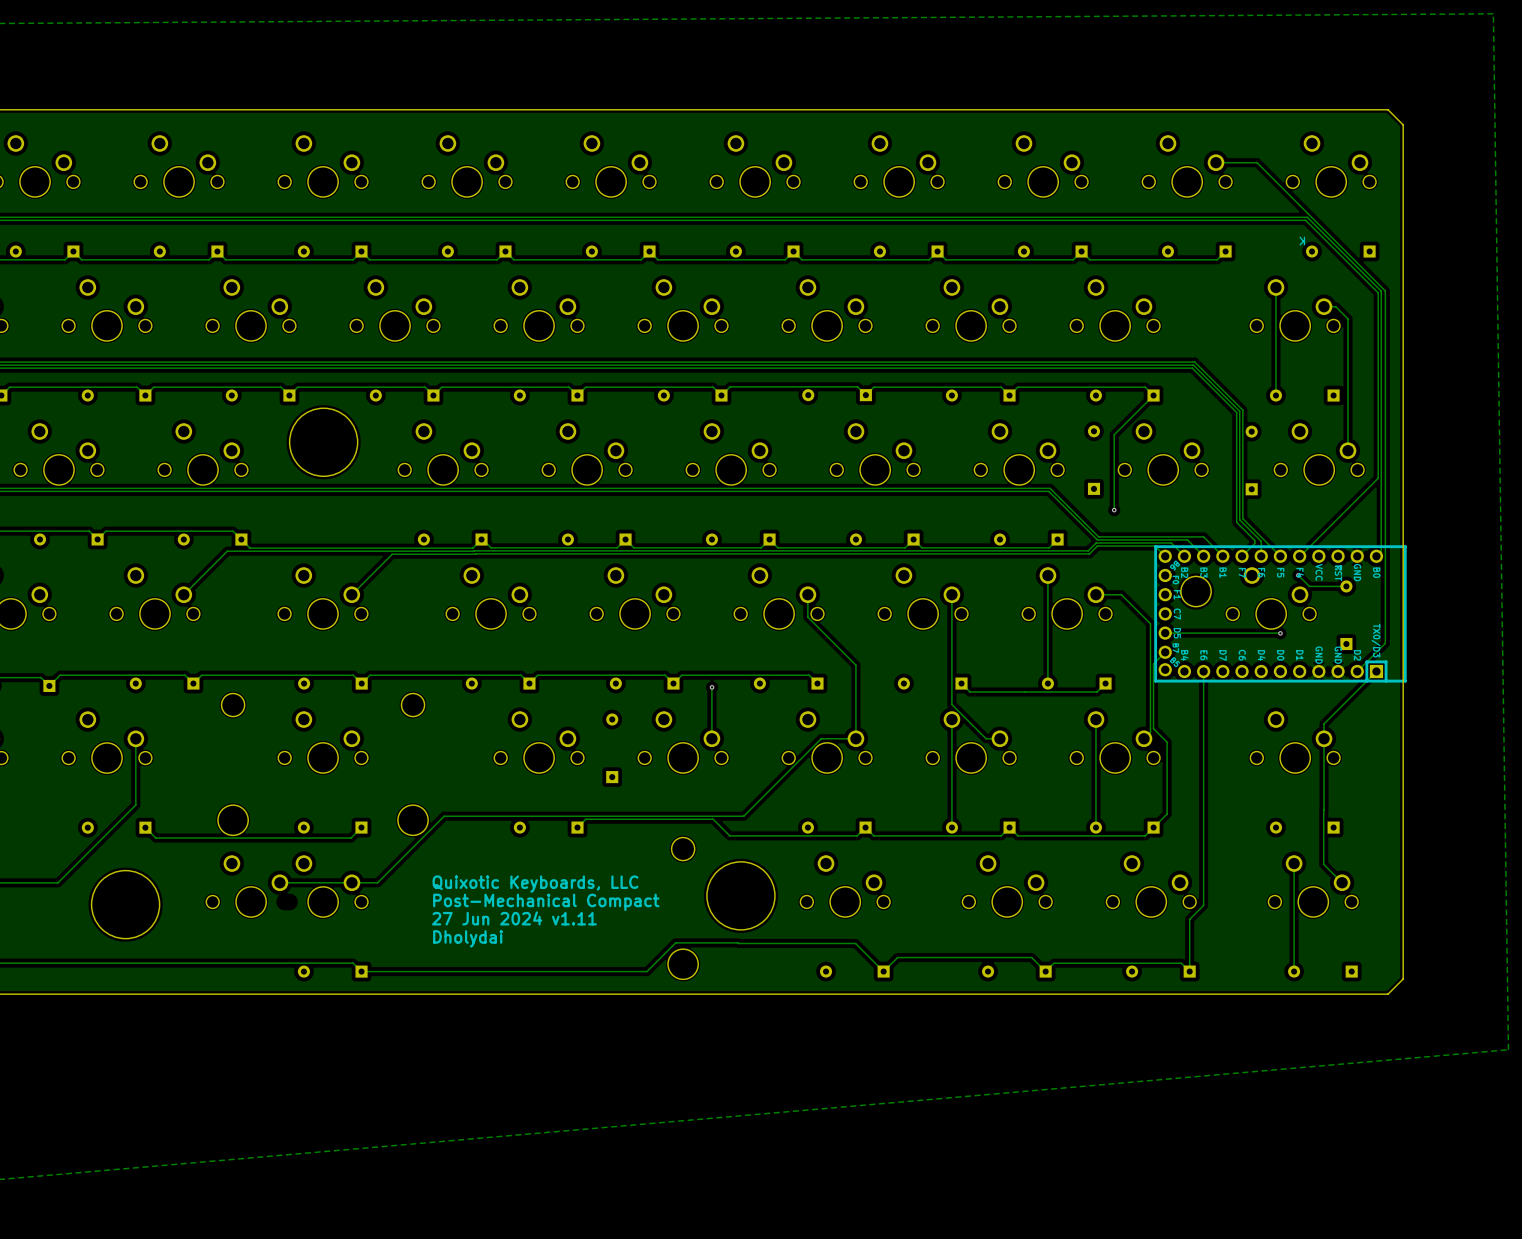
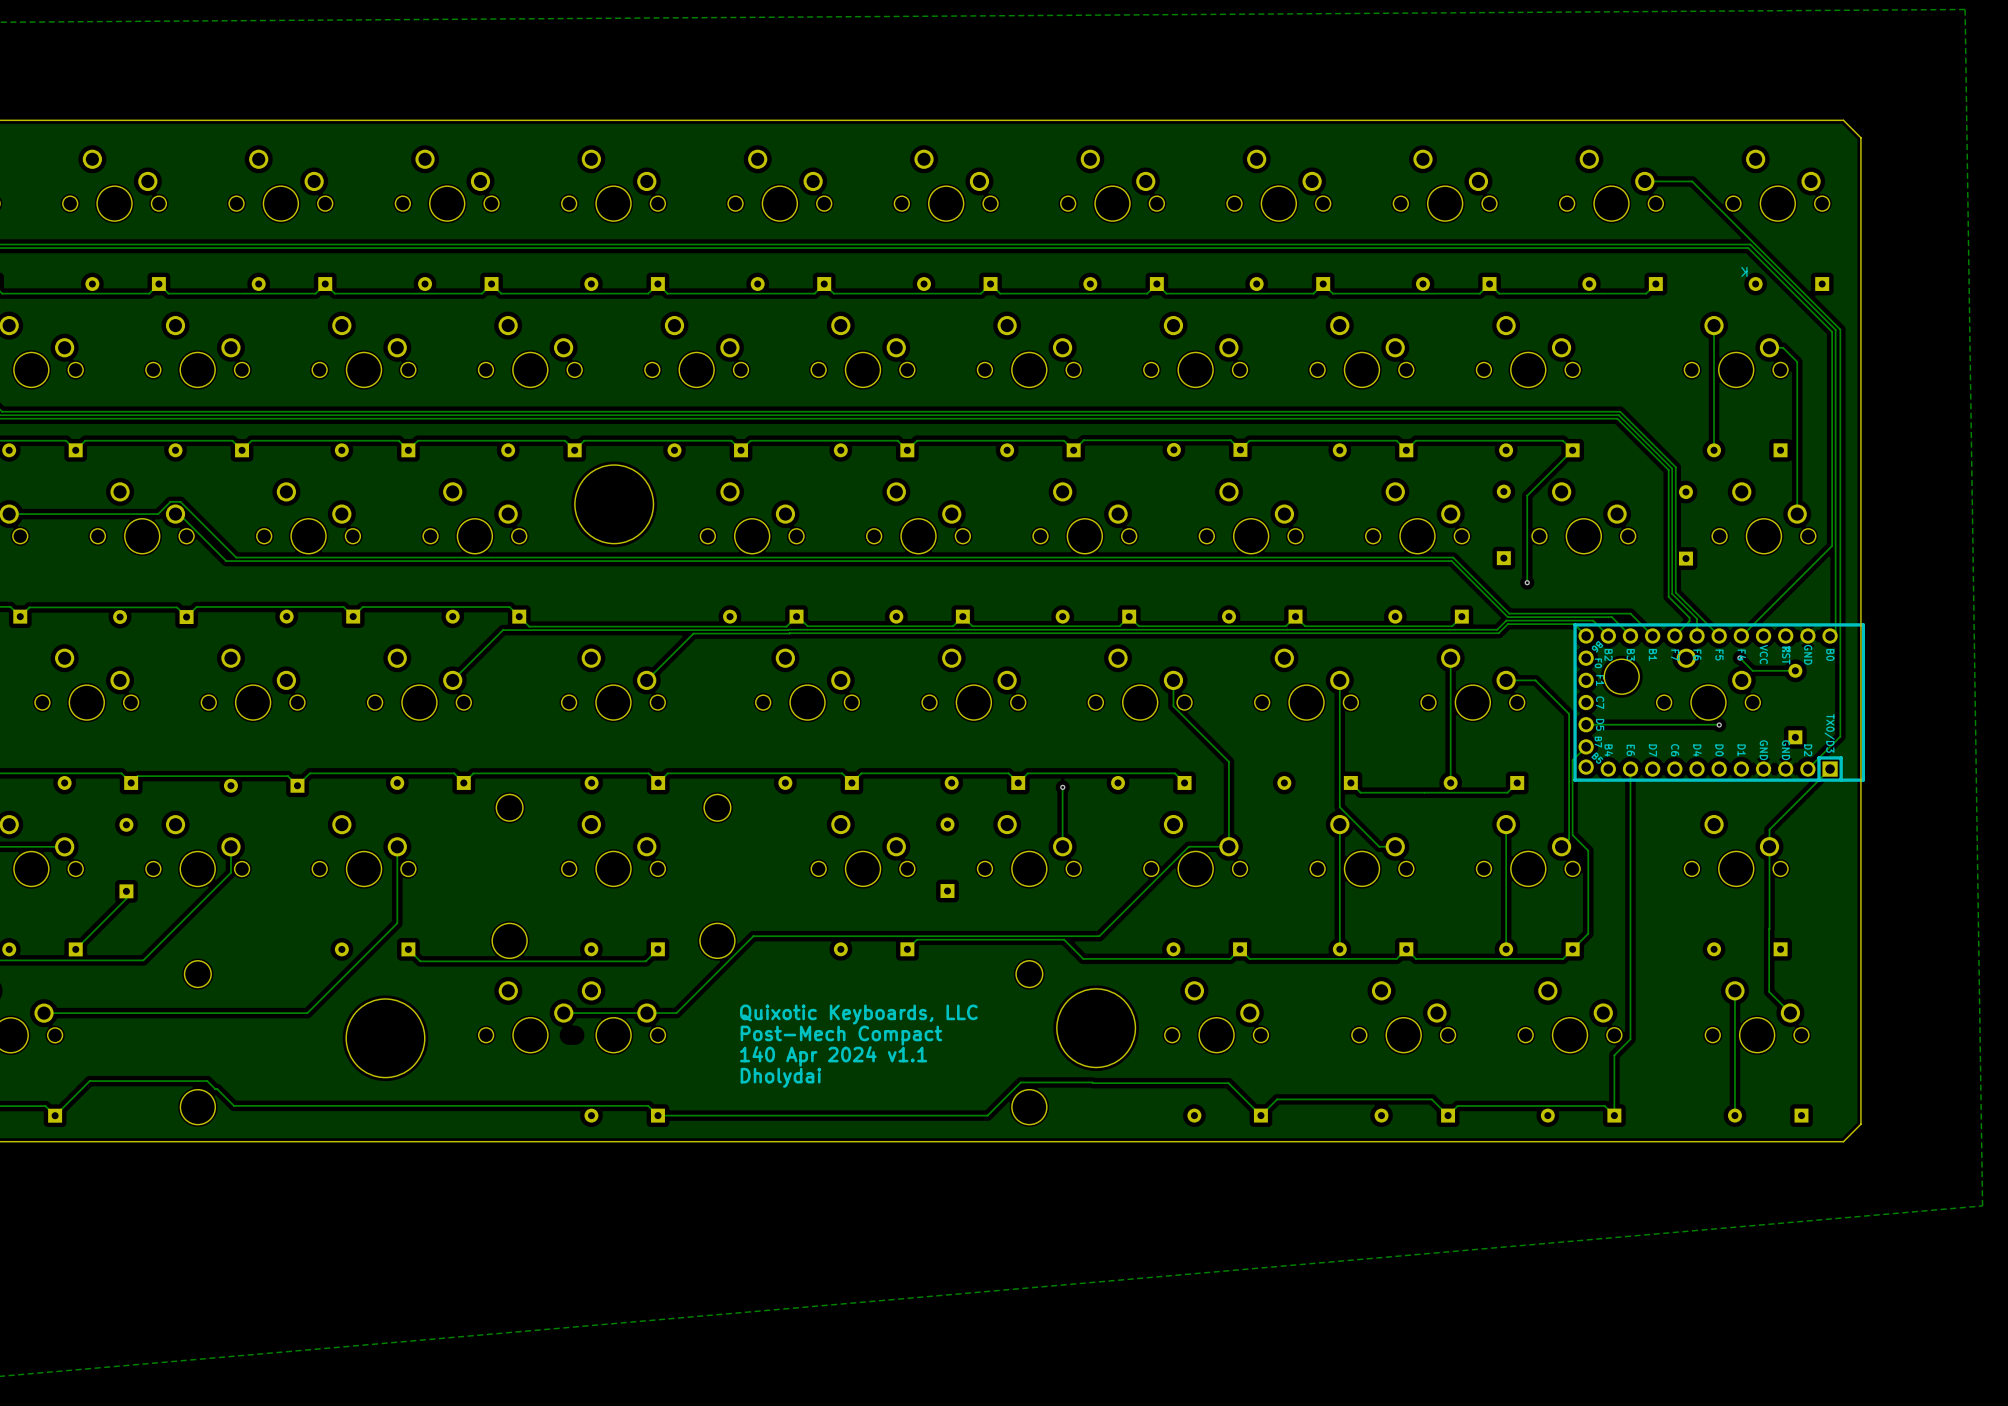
text: Post-Mechanical Compact (546, 902) -> Post-Mech Compact (841, 1035)
text: 27 Jun 2024 v1.11 (514, 918) -> 140 Apr 2024 v1.1 (833, 1056)

